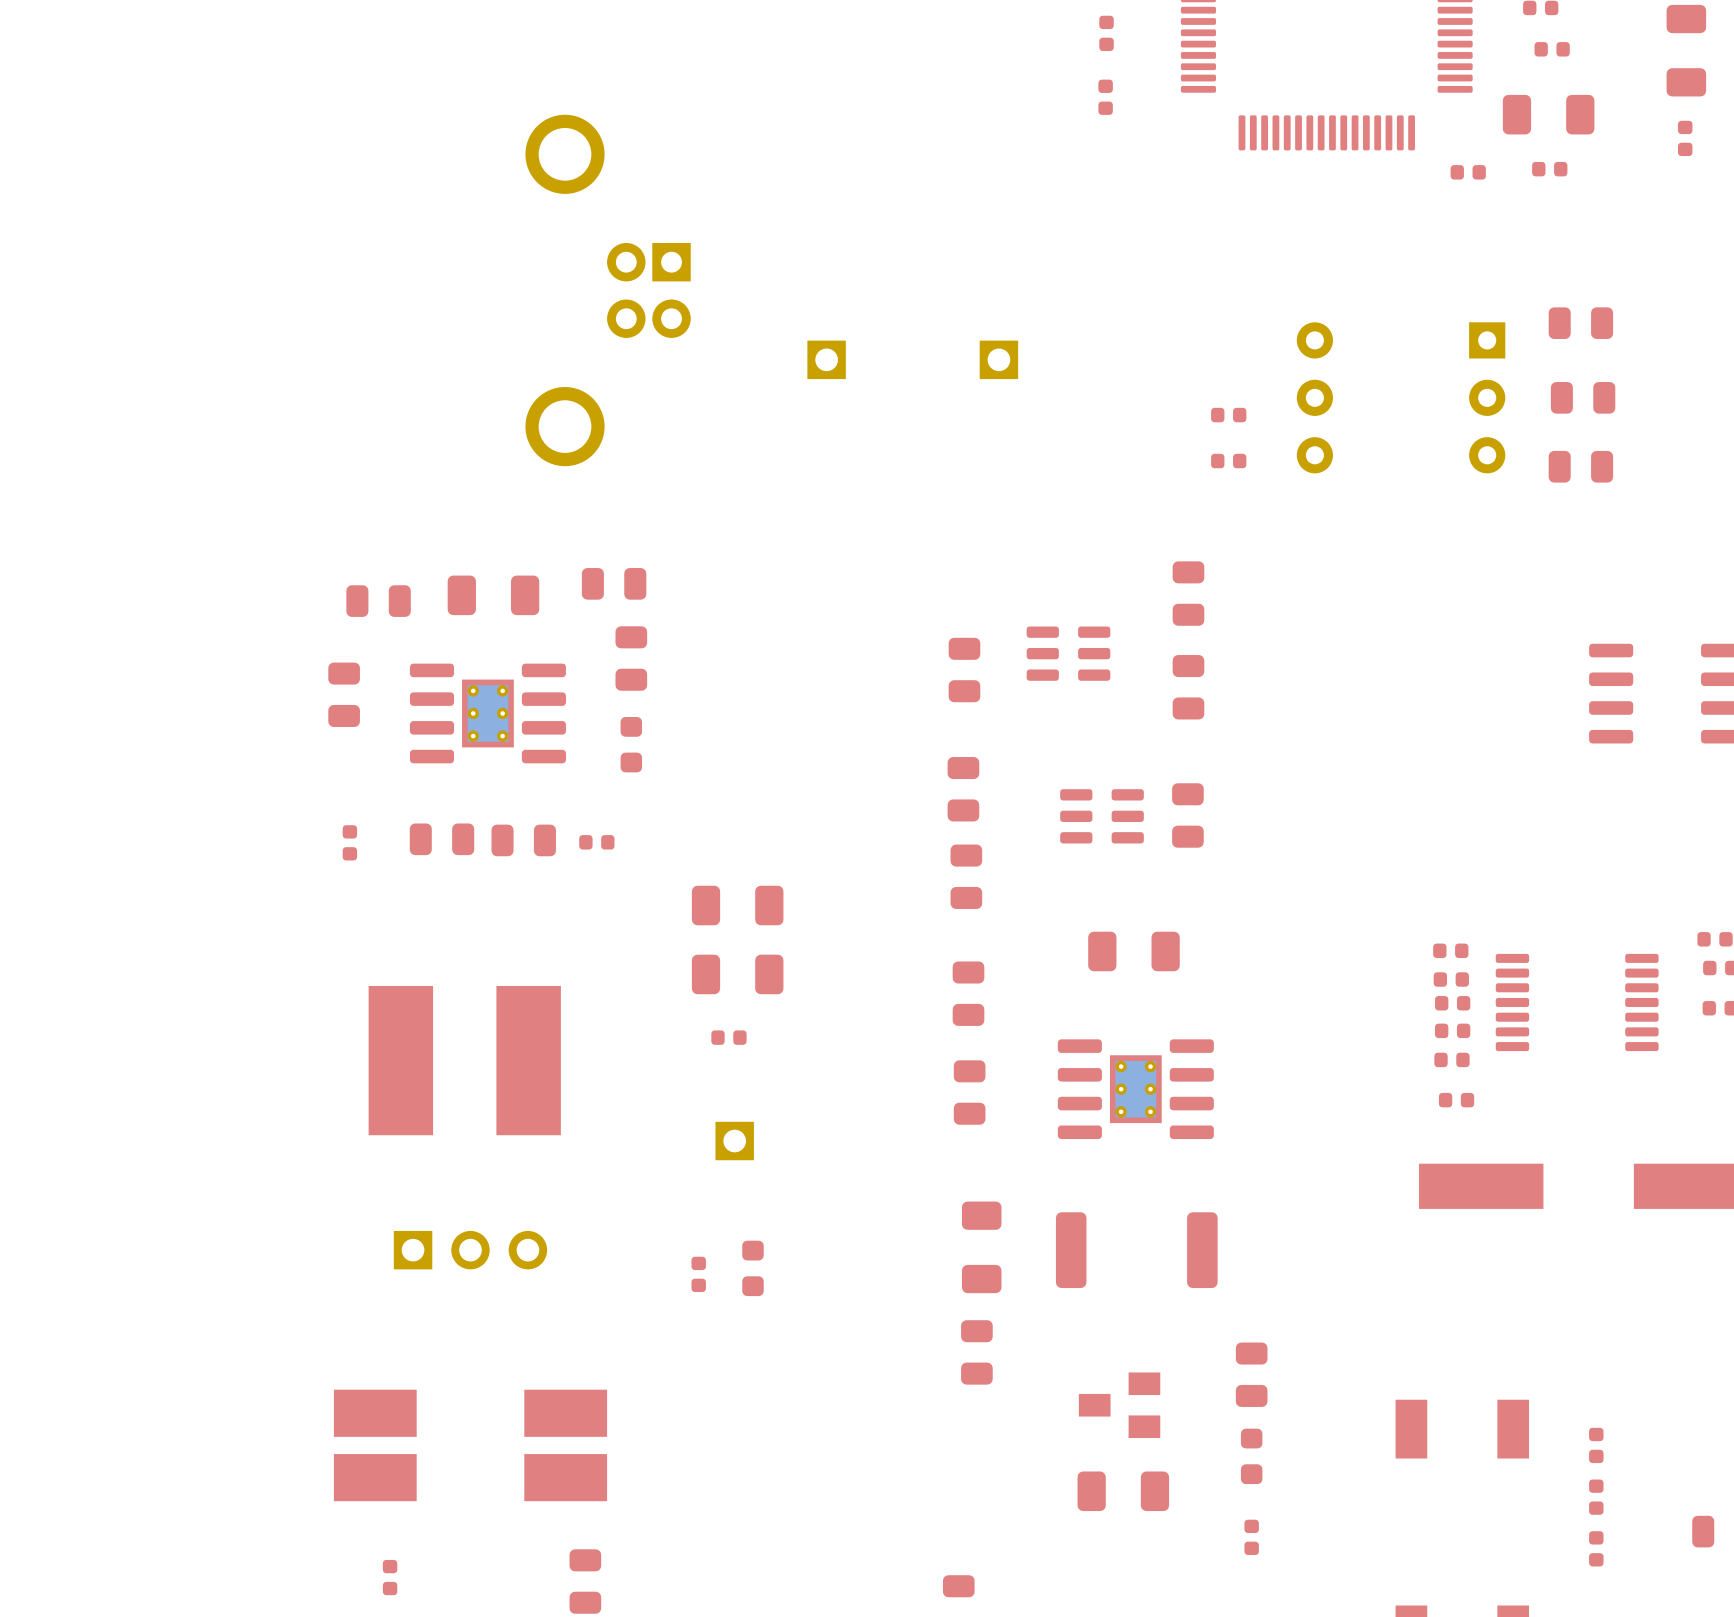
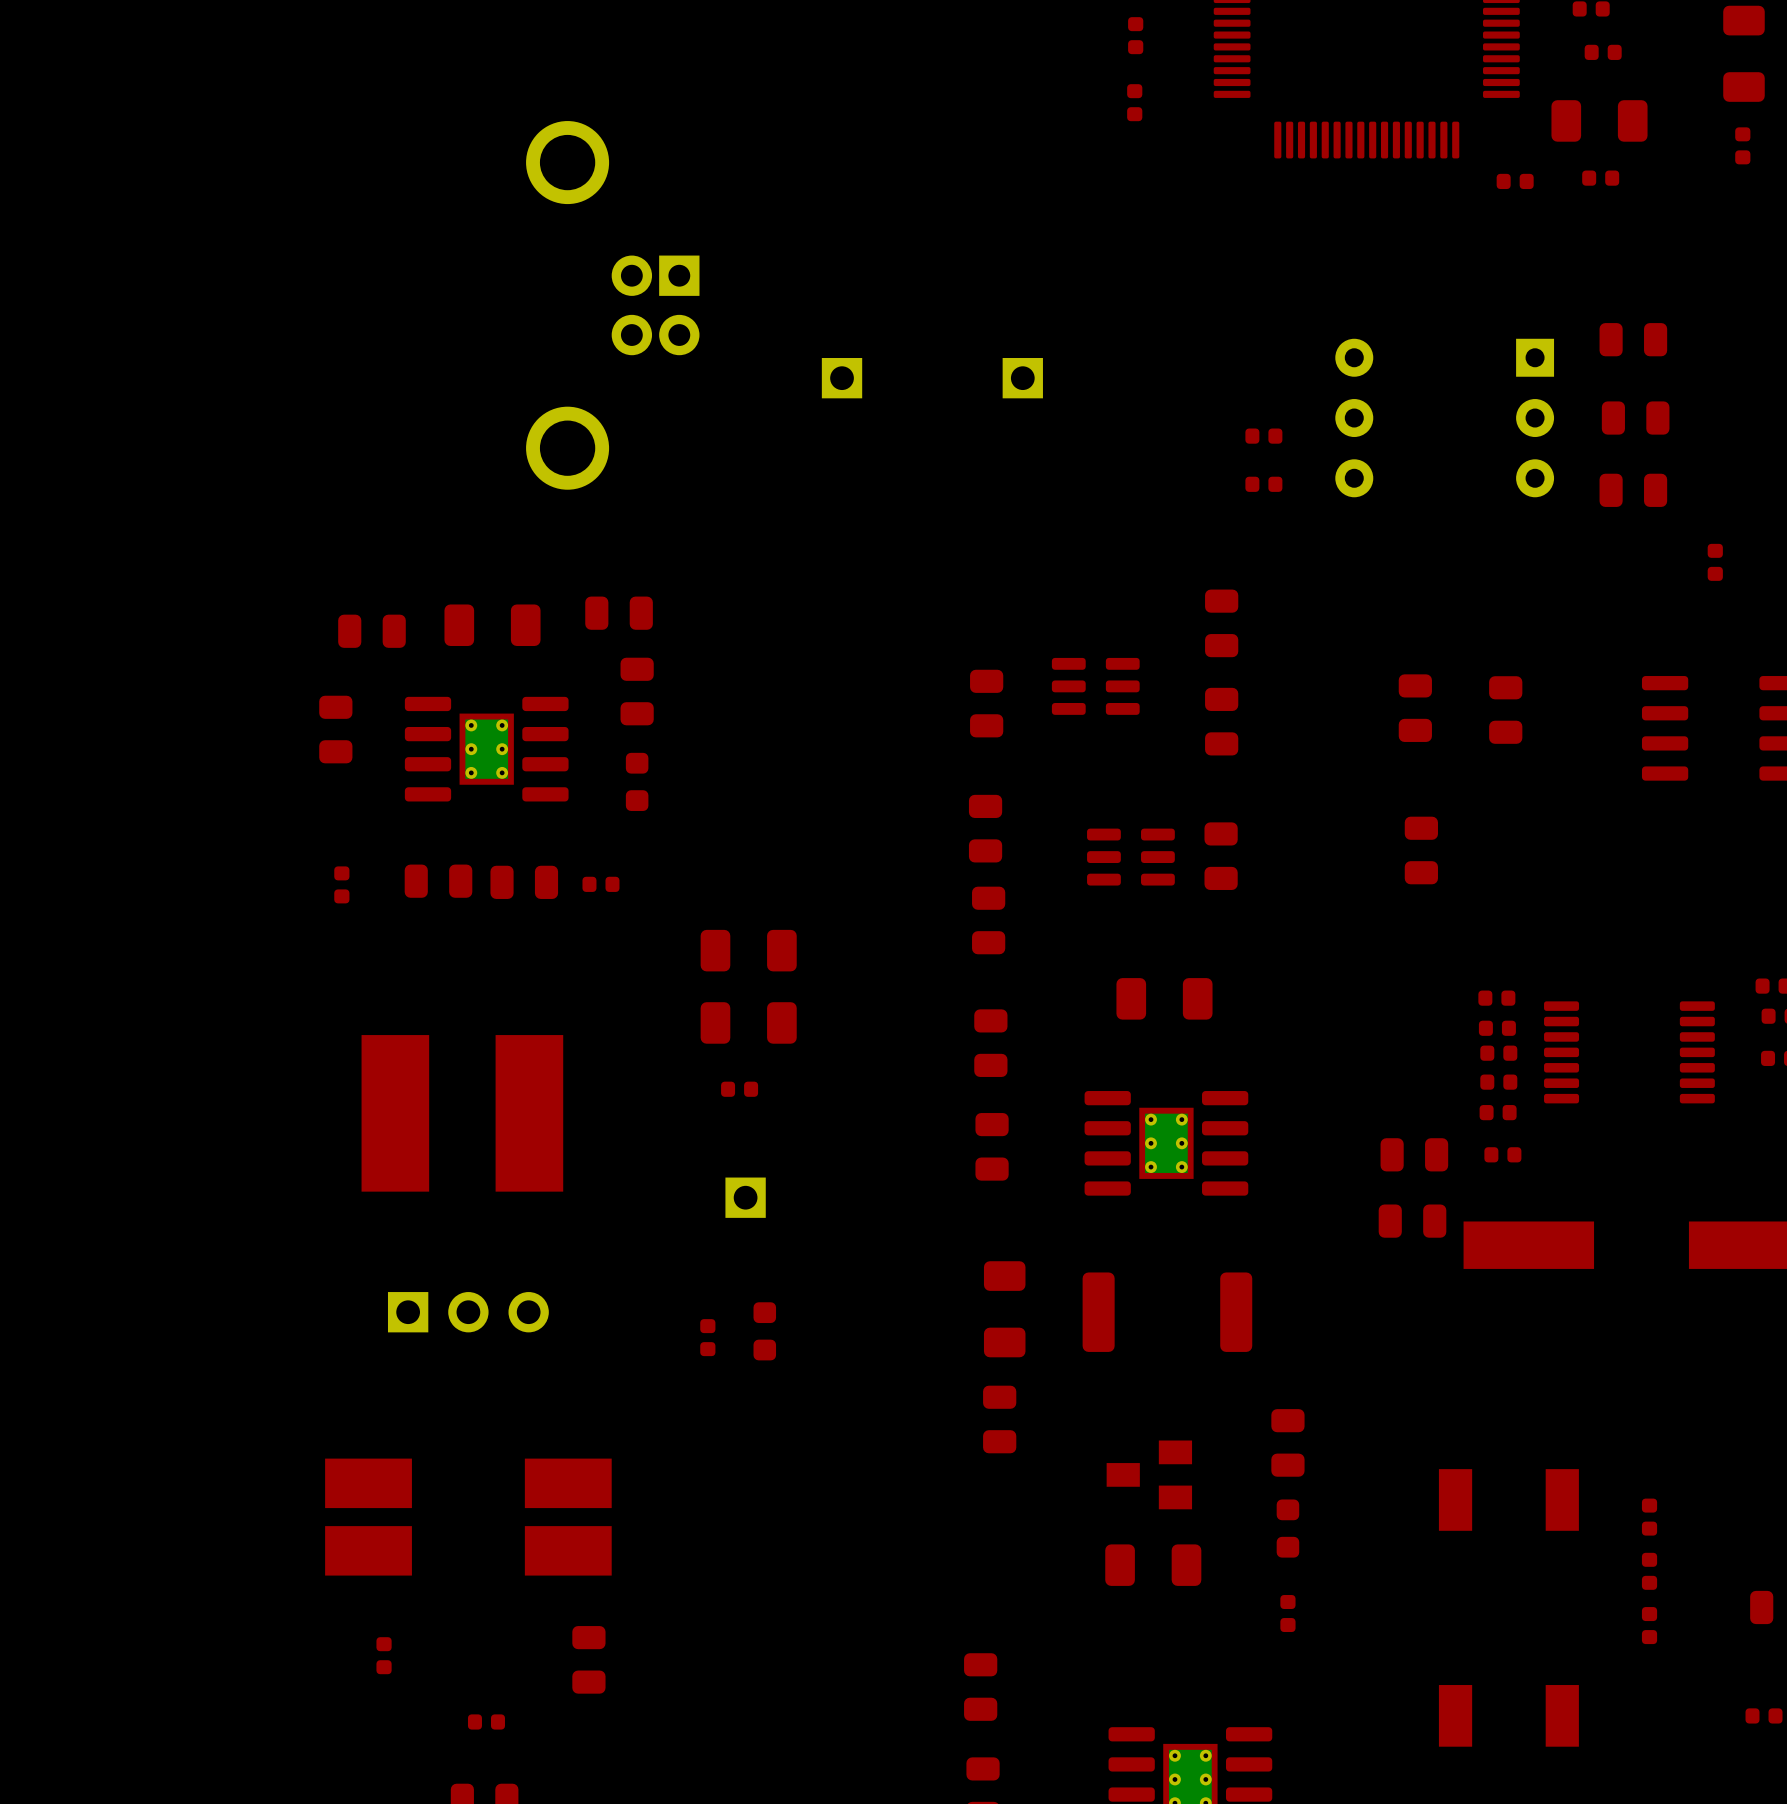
part: none -> (1715, 562)
part: none -> (1415, 708)
part: none -> (1505, 710)
part: none -> (1421, 850)
part: none -> (1414, 1154)
part: none -> (1412, 1221)

